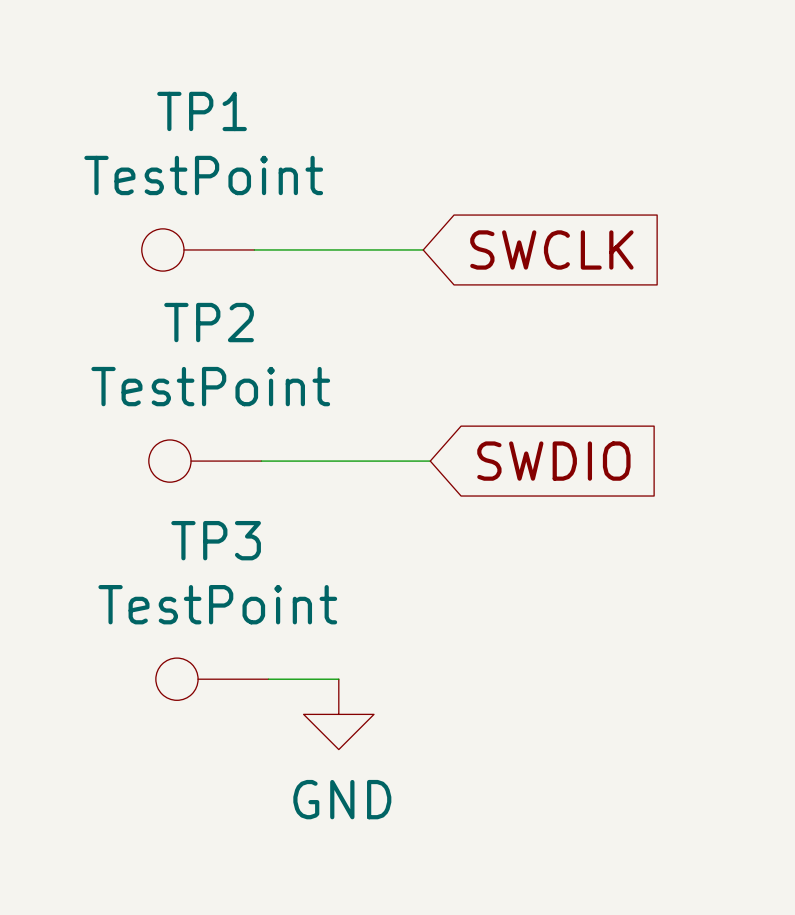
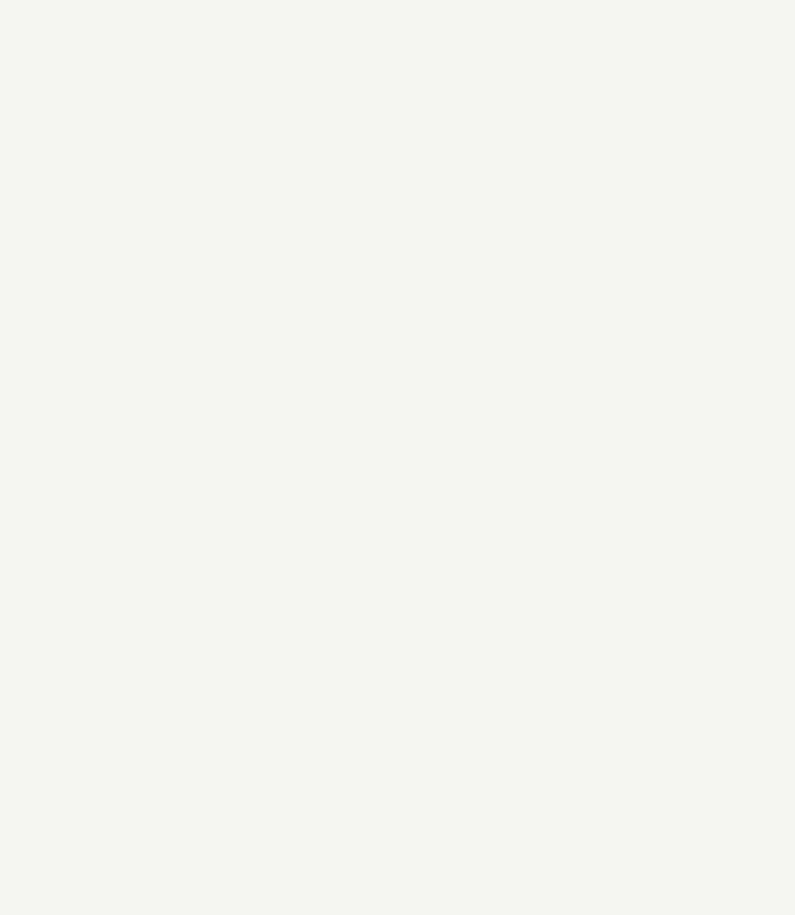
TP1: TestPoint (198, 249) -> none
wire: (254, 249) (423, 249) -> none
global label: SWCLK (551, 249) -> none
TP2: TestPoint (205, 461) -> none
wire: (261, 461) (430, 461) -> none
global label: SWDIO (553, 461) -> none
TP3: TestPoint (212, 679) -> none
wire: (268, 679) (338, 679) -> none
power symbol: GND (338, 714) -> none

